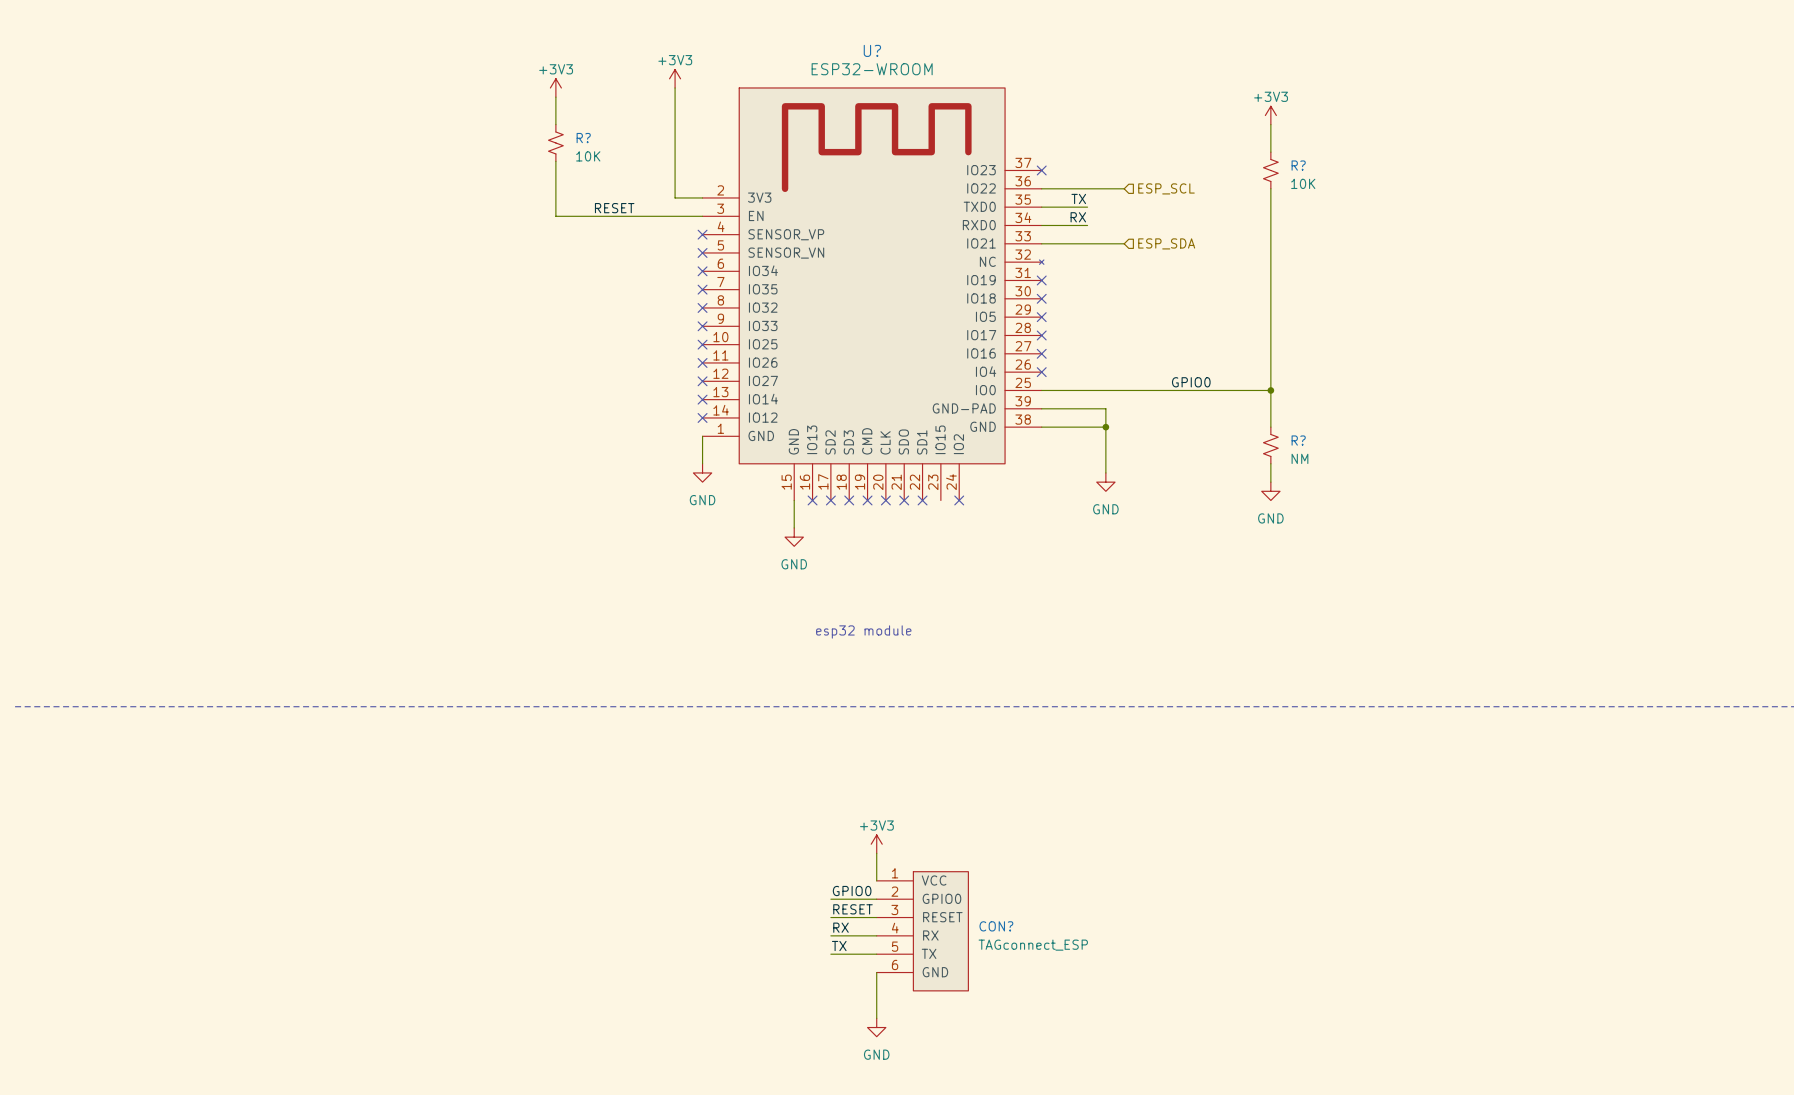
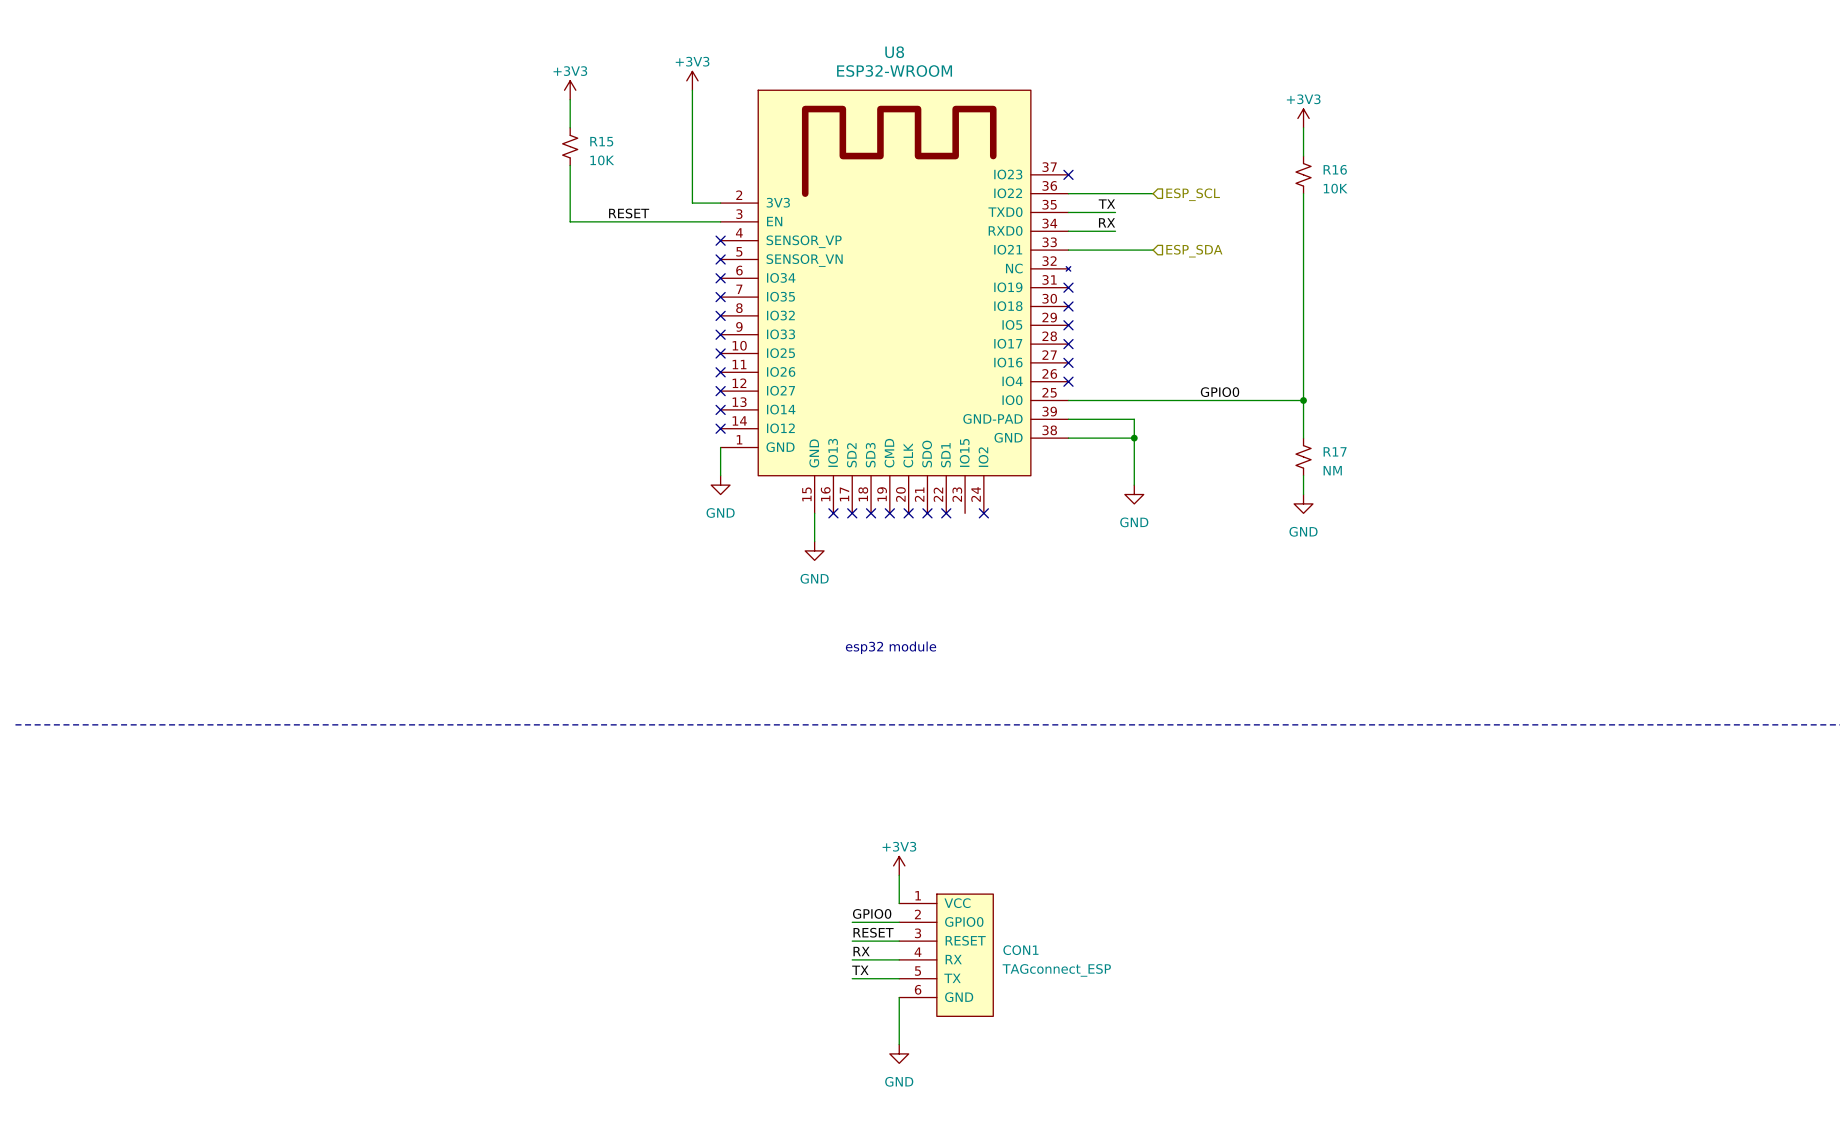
U? name: U? (872, 50) -> U8 (894, 52)
R? name: R? (583, 138) -> R15 (601, 141)
R? name: R? (1298, 165) -> R16 (1335, 169)
R? name: R? (1298, 440) -> R17 (1335, 451)
CON? name: CON? (996, 926) -> CON1 (1020, 950)

